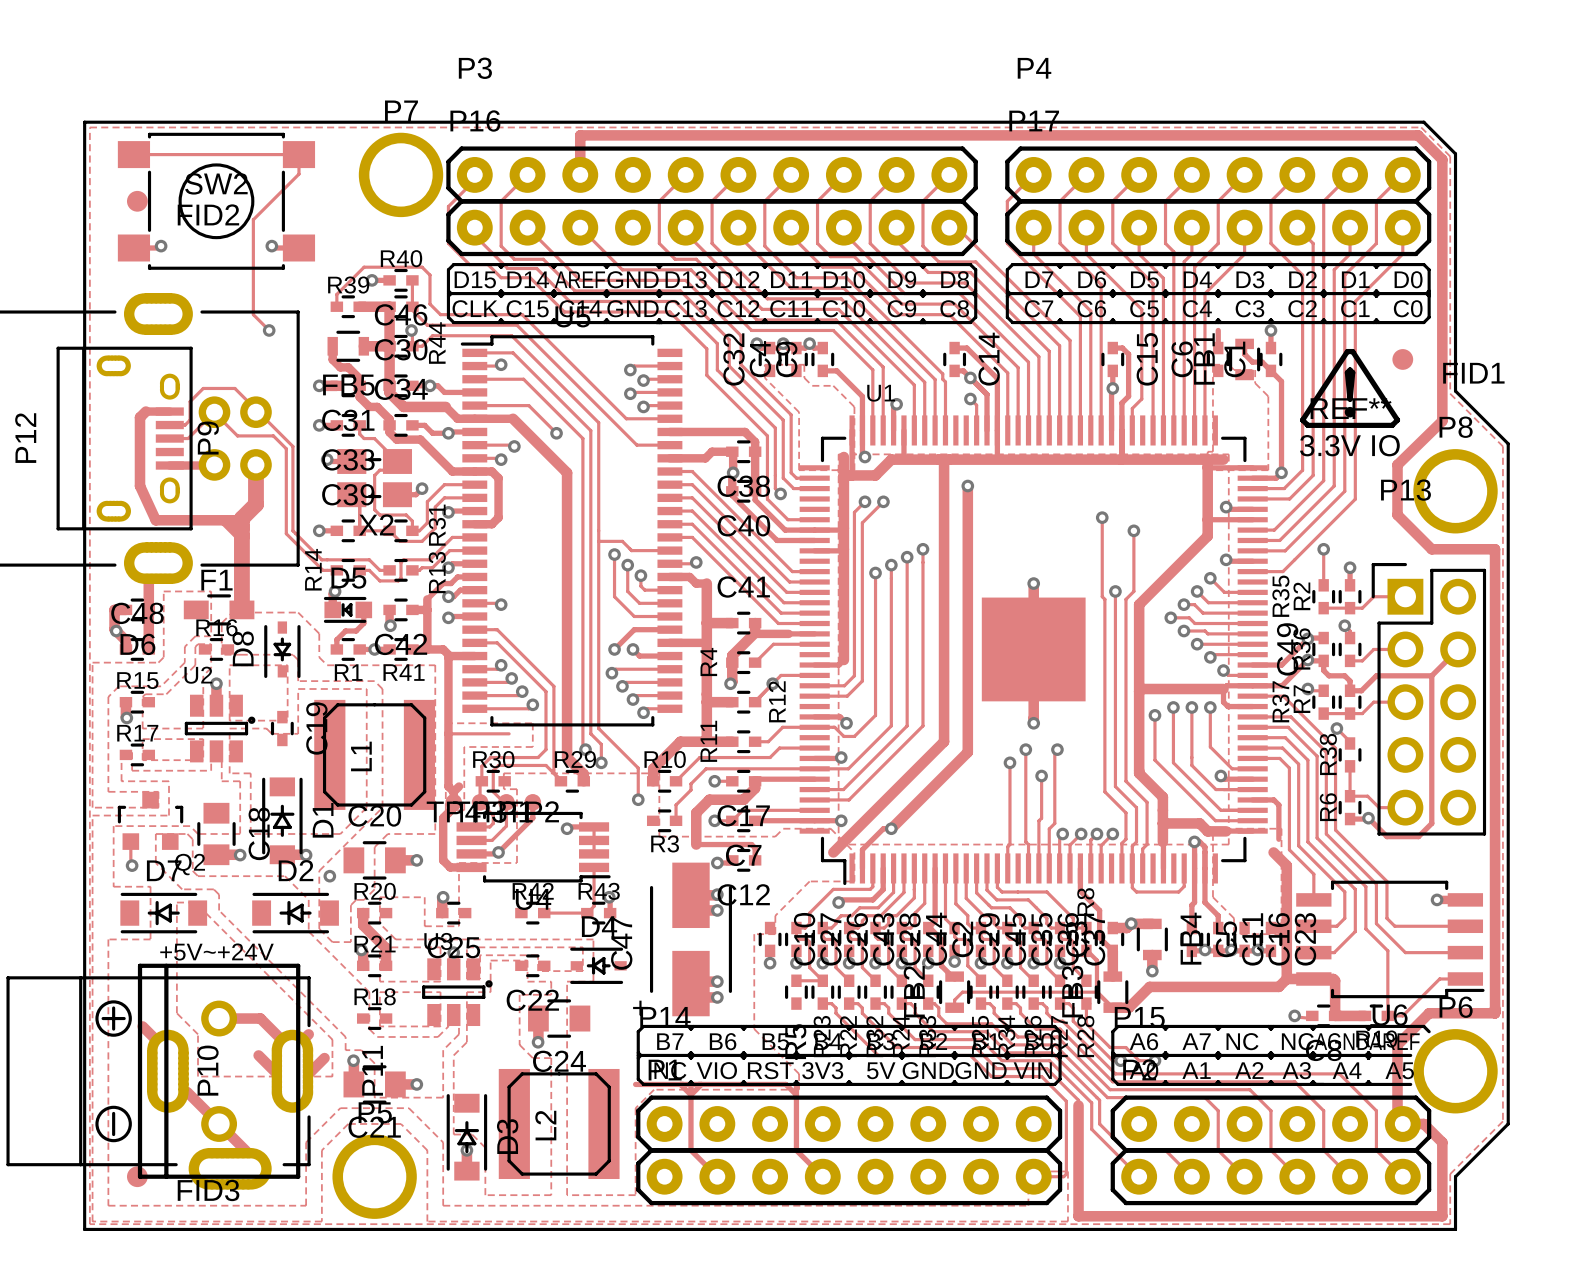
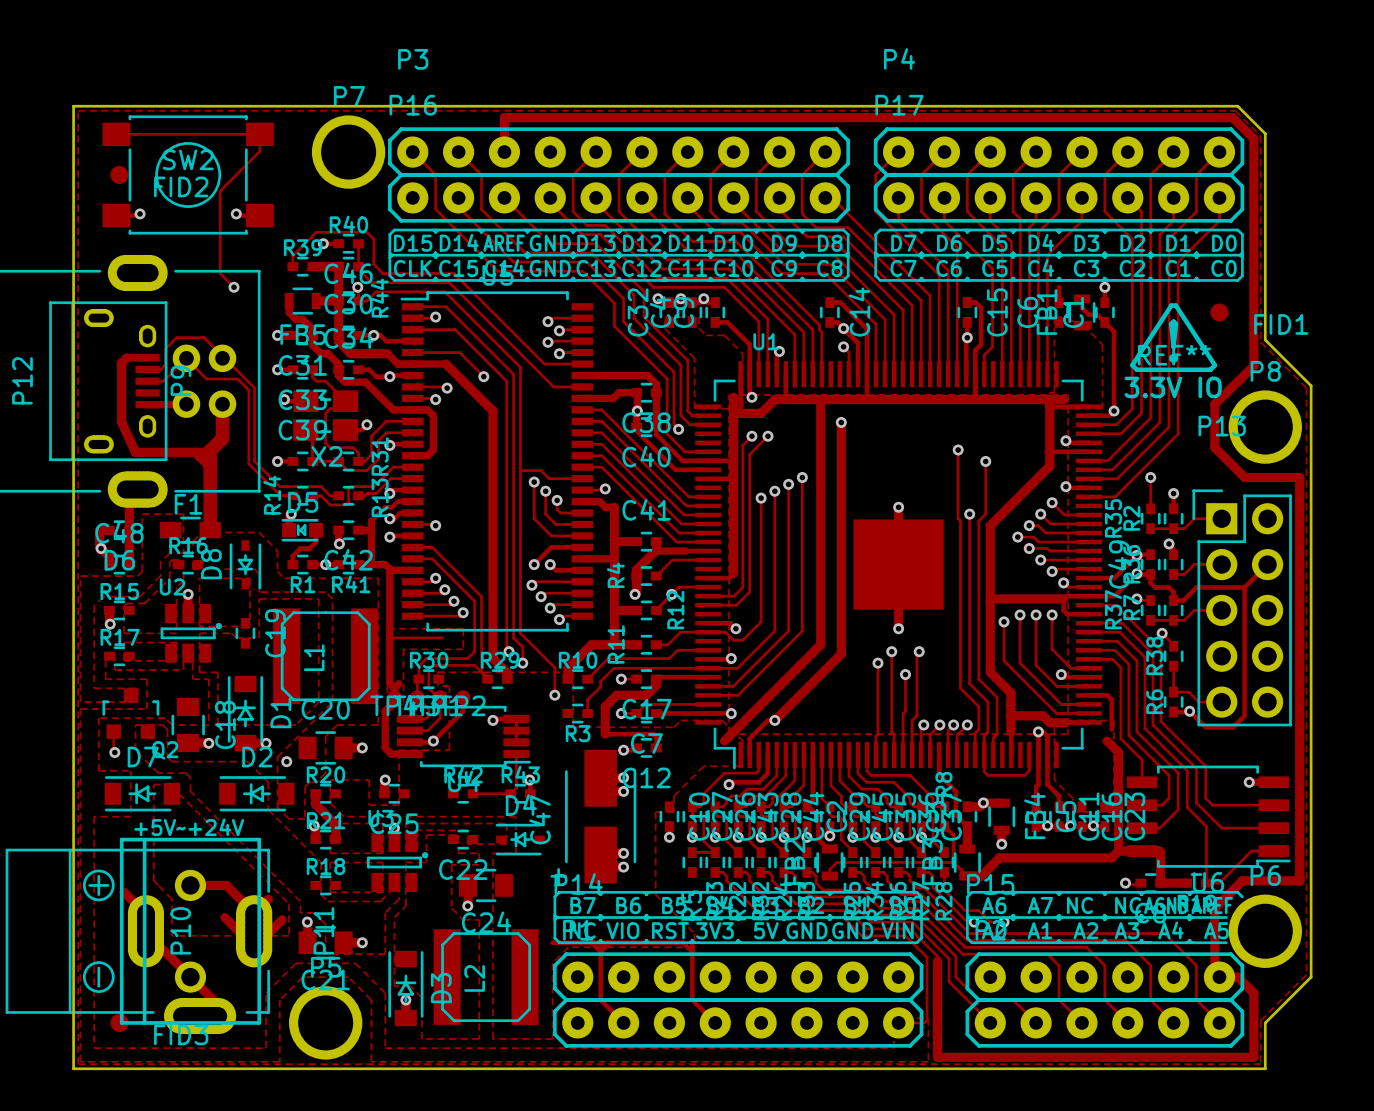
track: (527, 174) (501, 201) -> (412, 152) (435, 174)
track: none -> (458, 152) (481, 174) (481, 209) (525, 252)
track: (474, 180) (448, 206) (448, 243) (469, 264) (487, 264) (501, 277) (530, 277) (564, 312) (572, 312) -> none
track: (527, 227) (580, 280) (632, 280) -> (458, 197) (458, 207) (513, 262)
track: (474, 235) (507, 268) (536, 268) (569, 301) (590, 301) -> none
track: (501, 240) (501, 246) (514, 259) (543, 259) (574, 290) (603, 290) -> (435, 209) (497, 271)
track: (622, 269) (669, 269) -> (550, 202) (582, 234)

